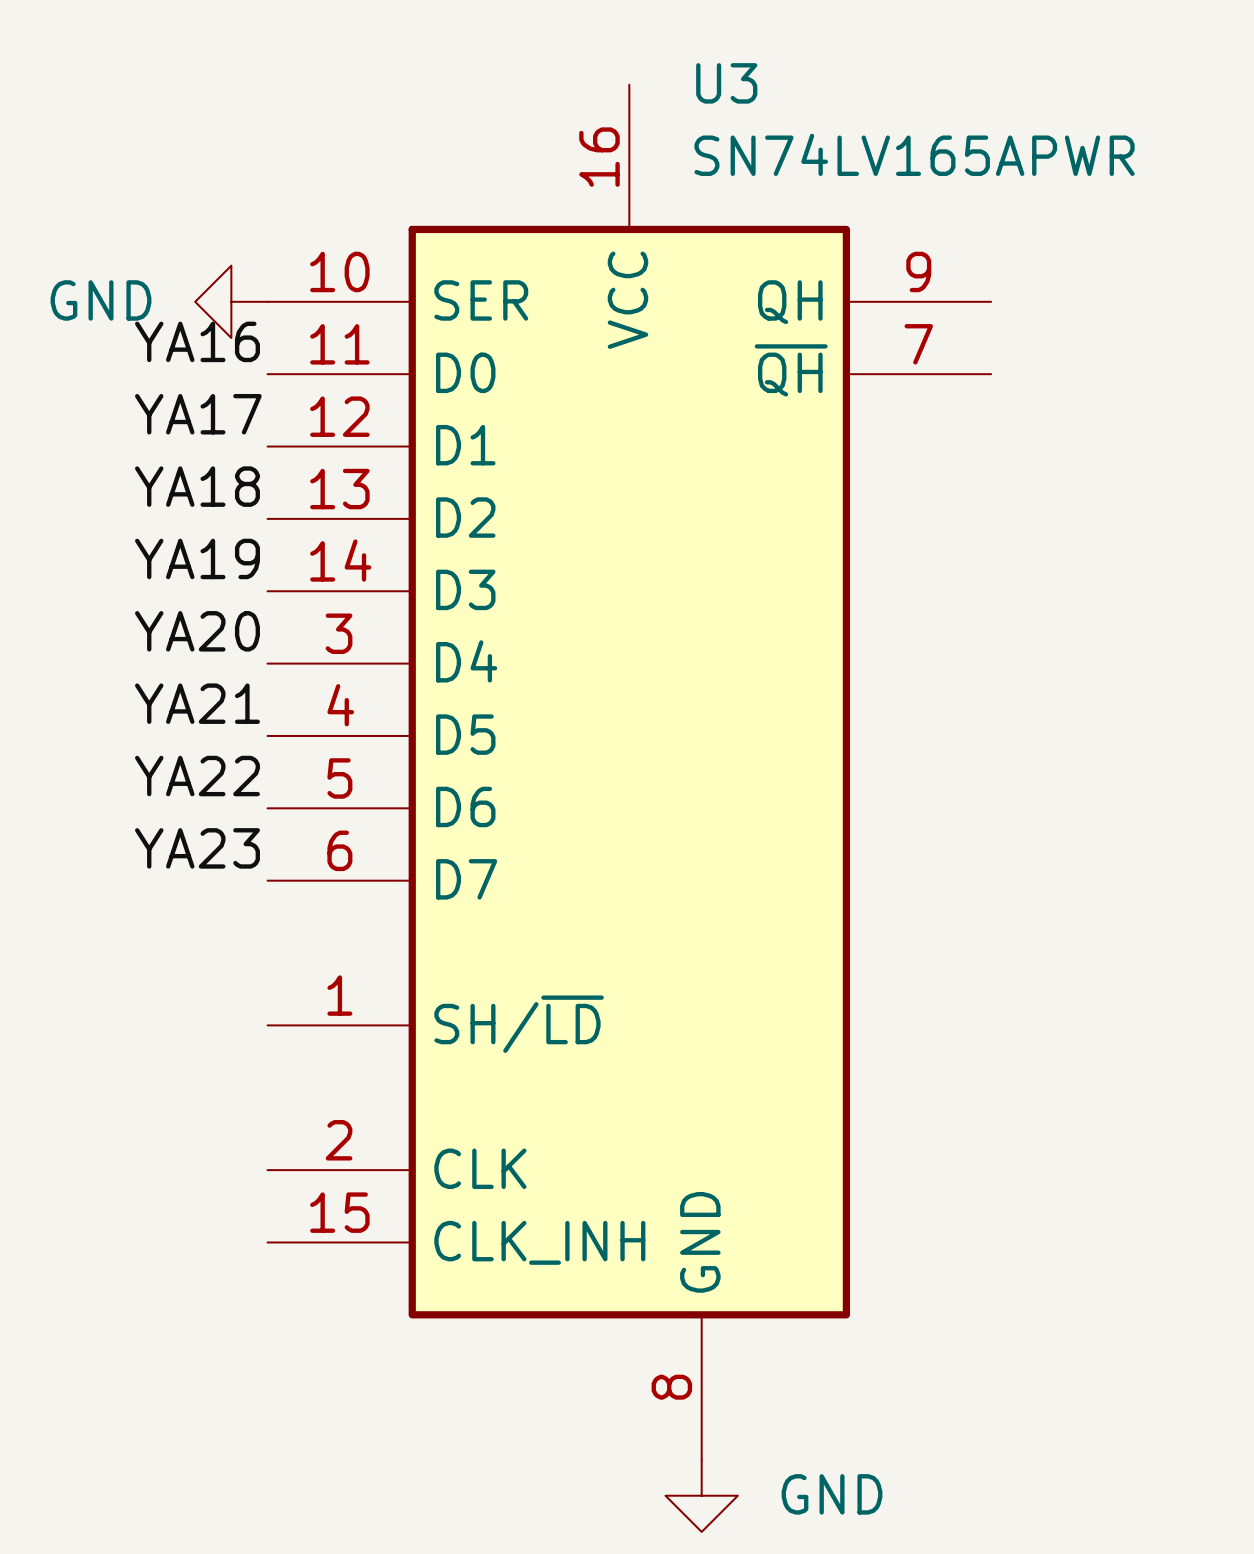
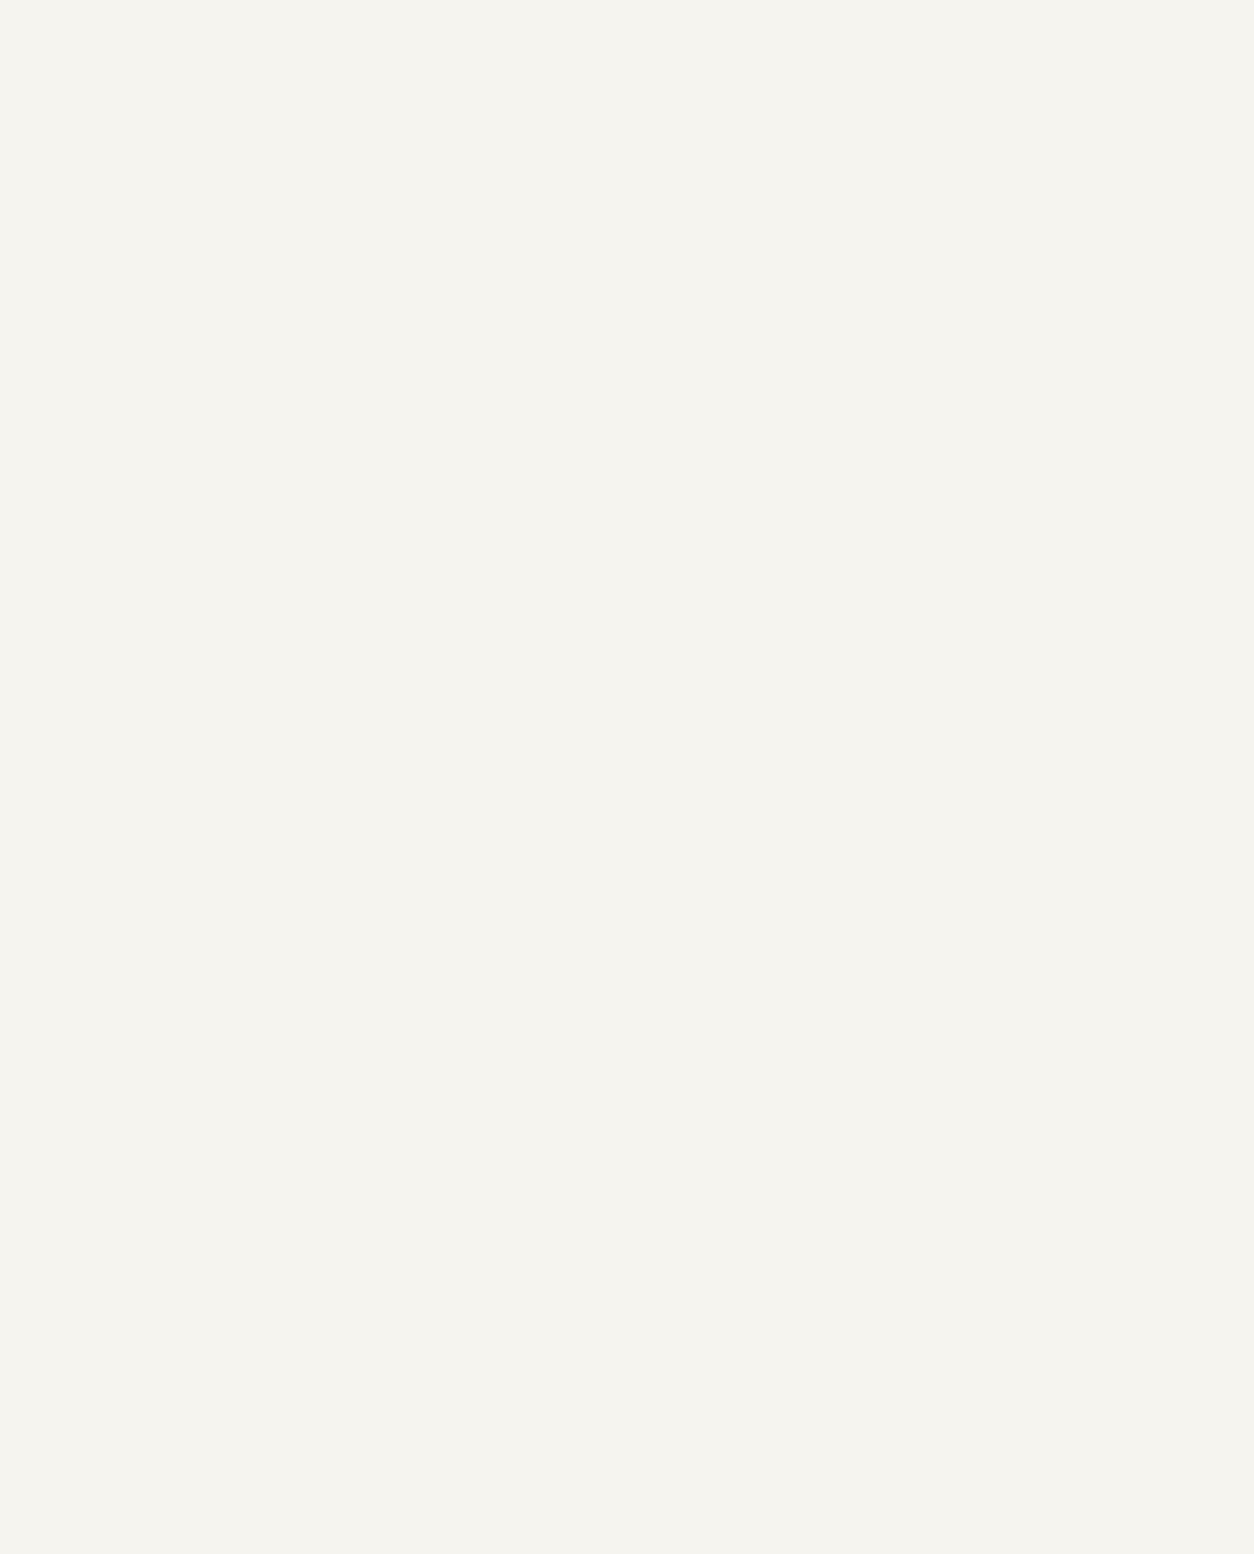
power symbol: GND (231, 301) -> none
label: YA16 (197, 341) -> none
label: YA17 (198, 414) -> none
label: YA18 (197, 486) -> none
label: YA19 (197, 558) -> none
label: YA20 (197, 631) -> none
label: YA21 (197, 703) -> none
U3: SN74LV165APWR (629, 772) -> none
label: YA22 (197, 776) -> none
label: YA23 (197, 848) -> none
power symbol: GND (701, 1495) -> none

